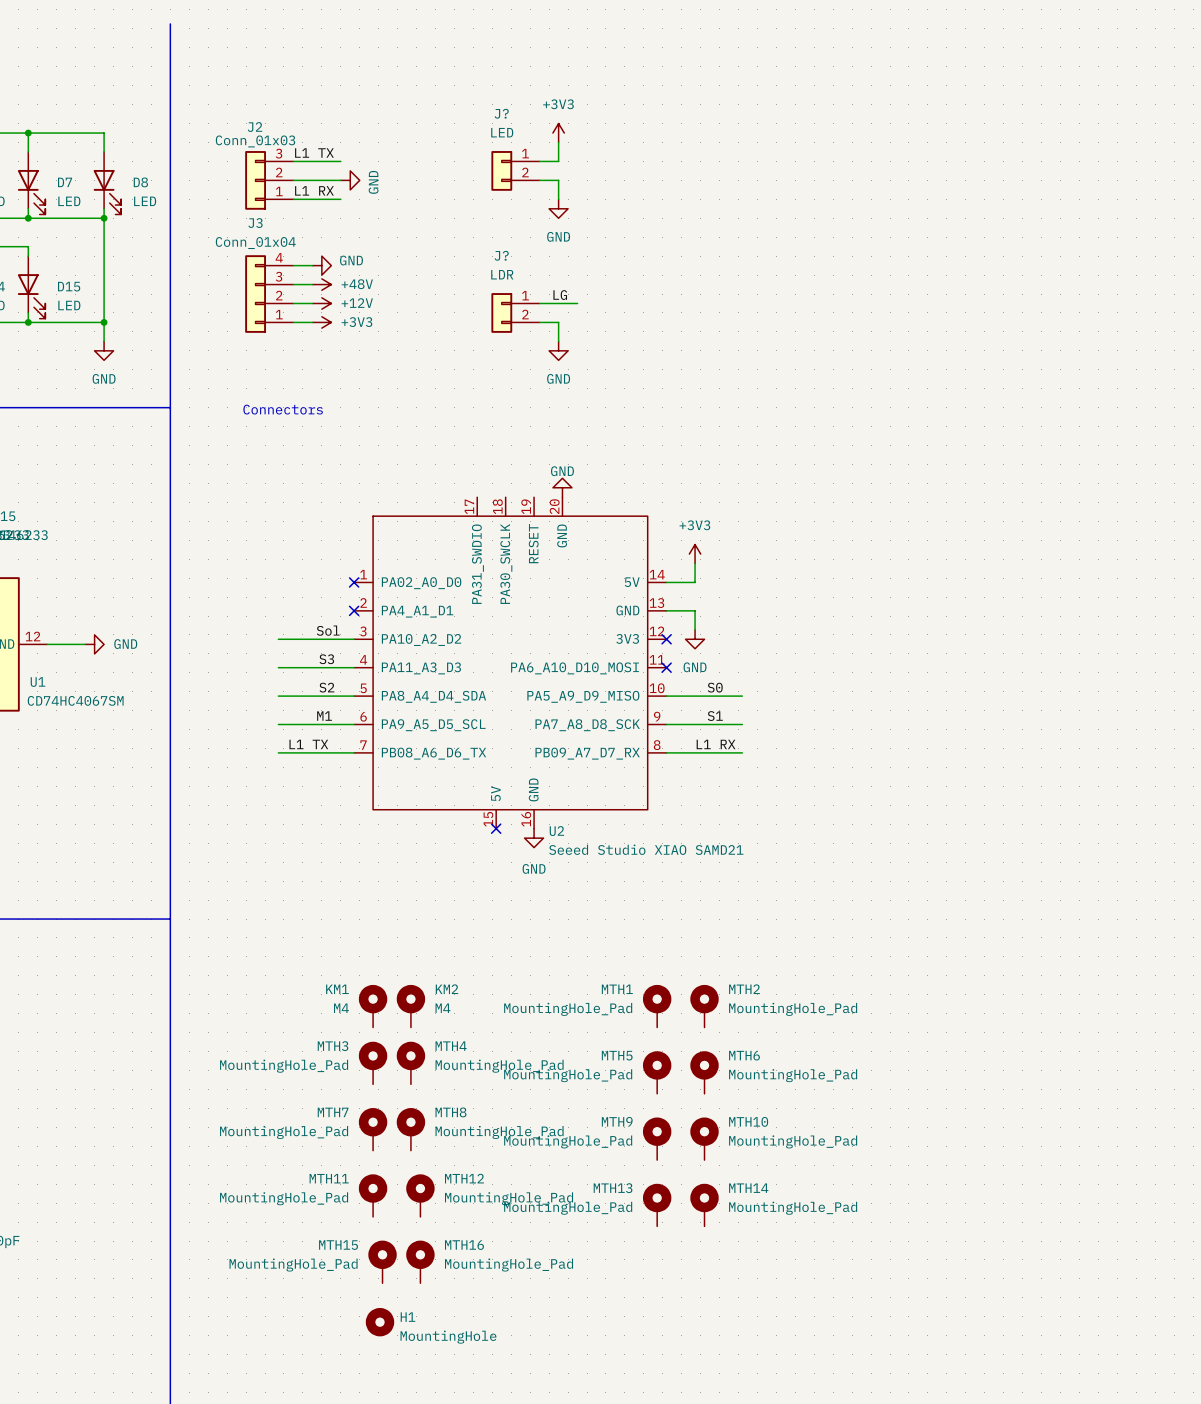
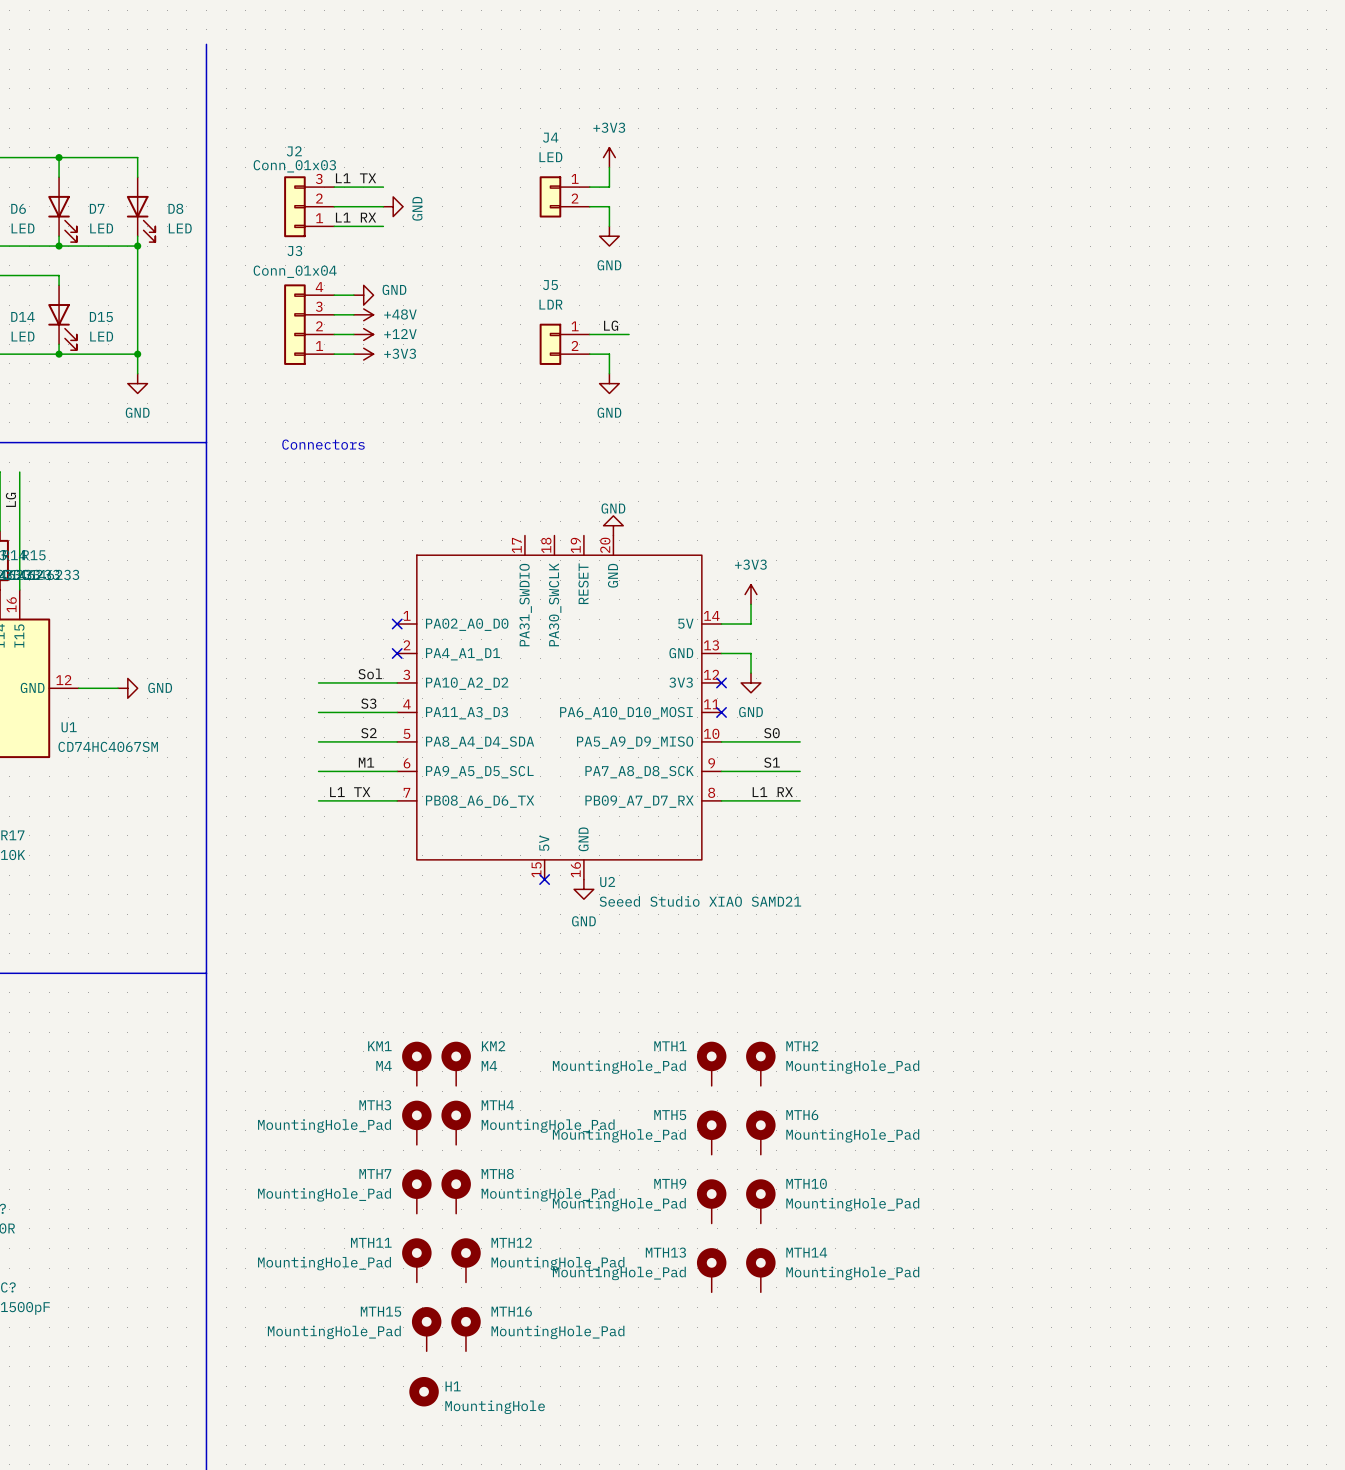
J? name: J? (501, 113) -> J4 (550, 137)
J? name: J? (501, 255) -> J5 (550, 285)

